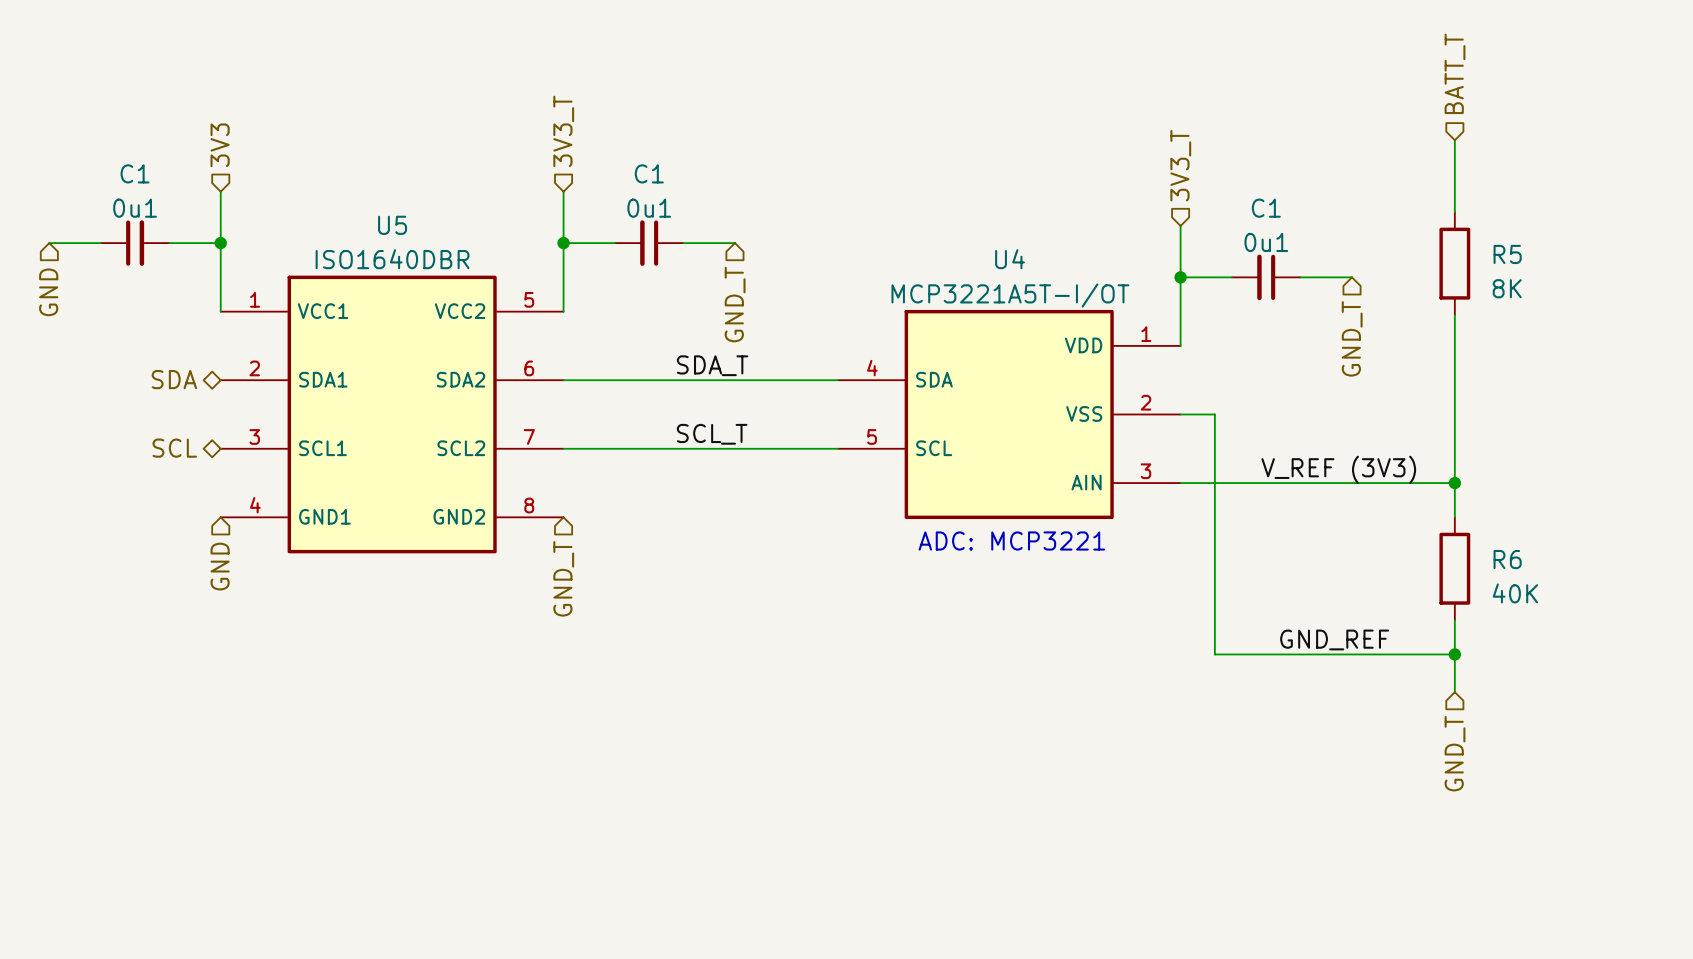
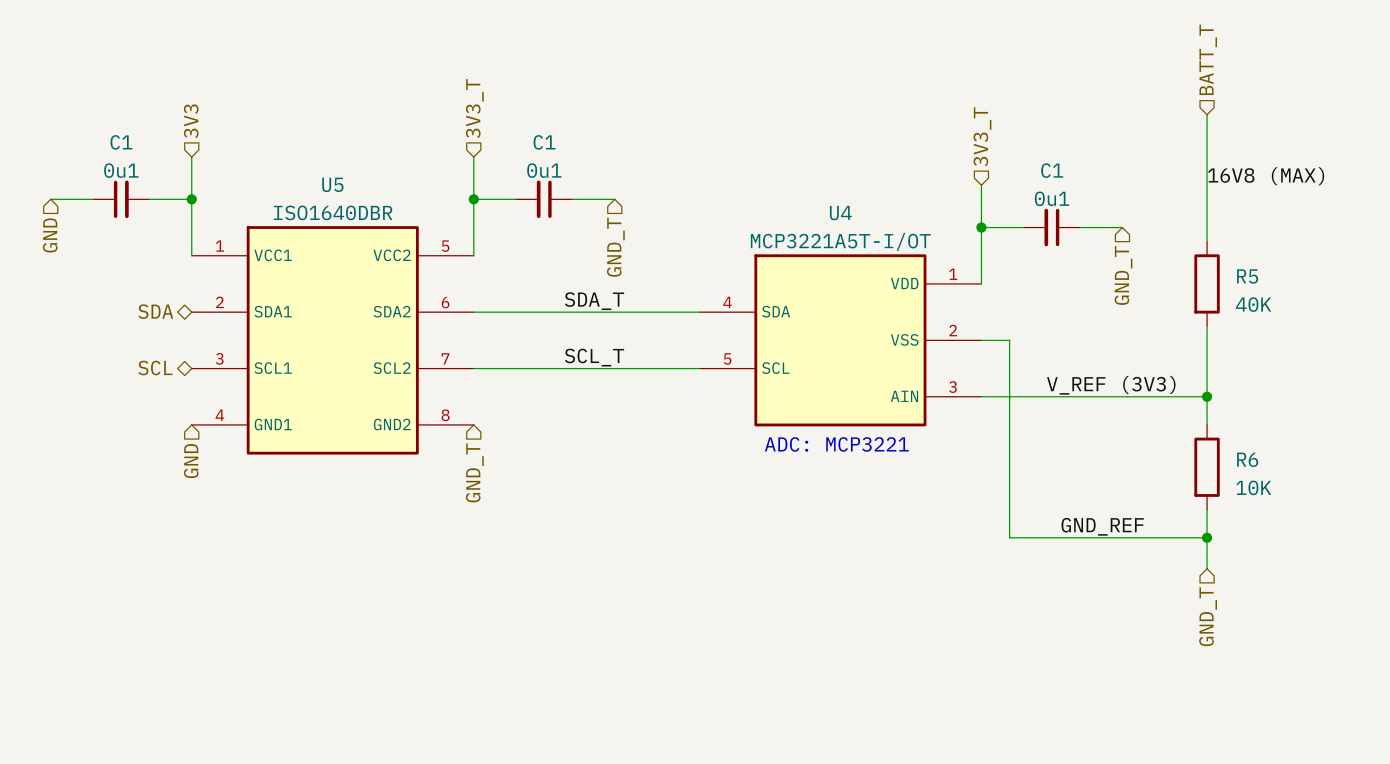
label: none -> 16V8 (MAX) (1266, 176)
R5 position: (1454, 263) -> (1207, 283)
R5 value: 8K (1507, 288) -> 40K (1253, 304)
wire: (1454, 315) (1454, 397) -> (1207, 173) (1207, 241)
R6 value: 40K (1515, 593) -> 10K (1253, 487)

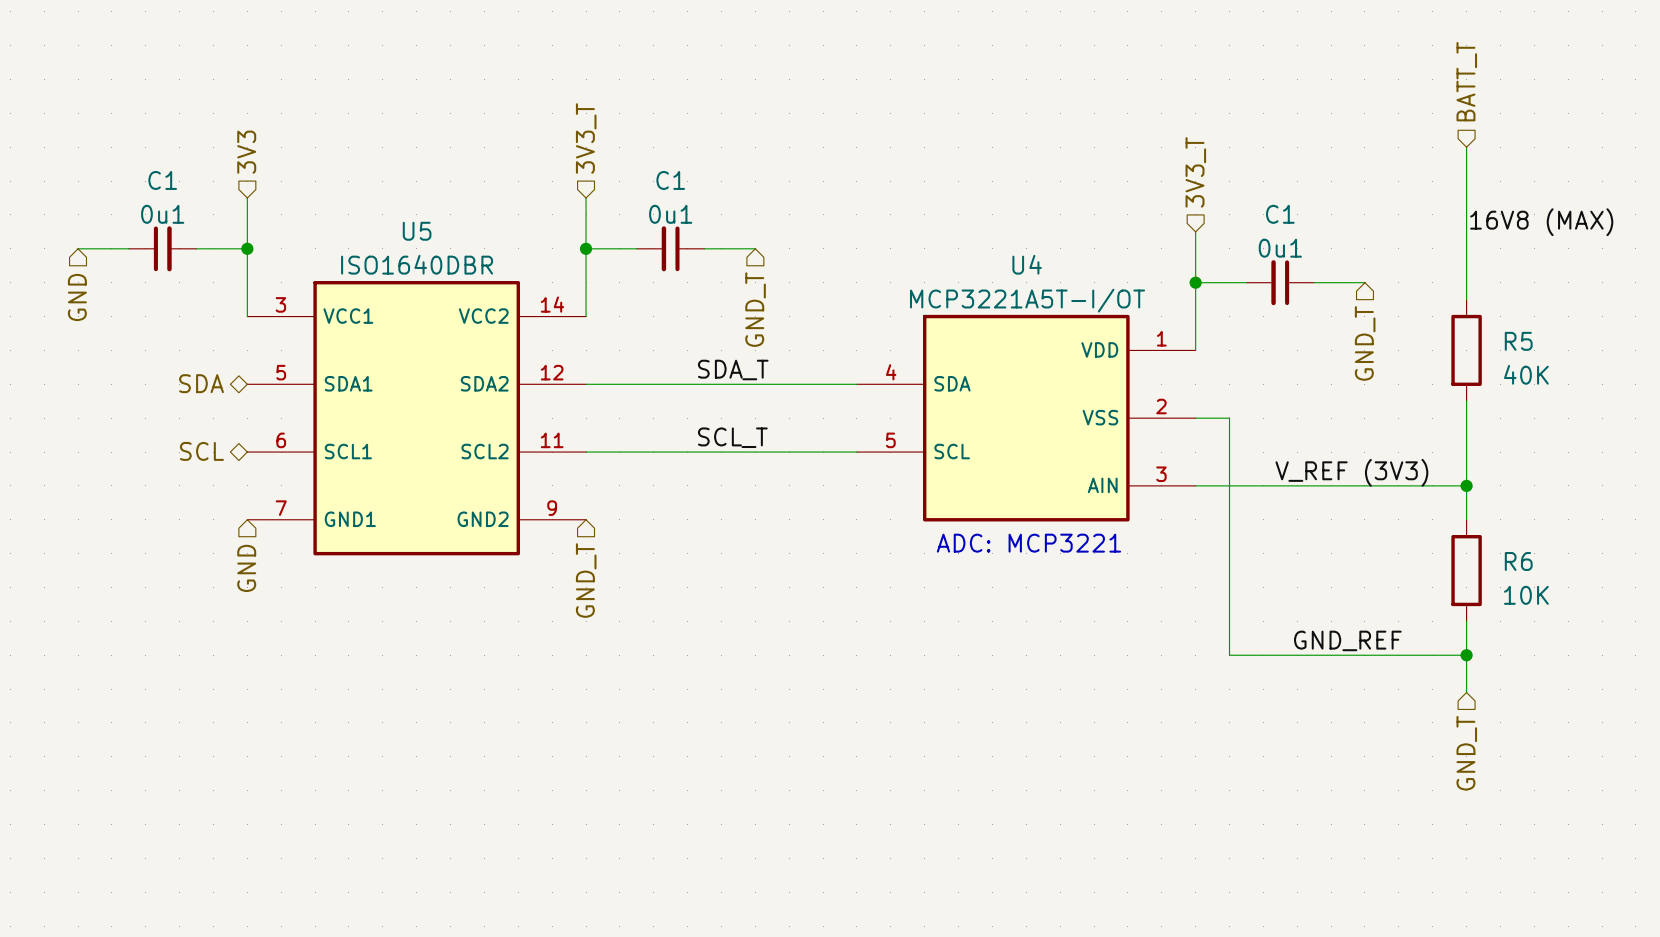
U5 pin number: 1 (220, 246) -> 3 (280, 304)
U5 pin number: 5 (445, 246) -> 14 (552, 304)
U5 pin number: 2 (219, 302) -> 5 (281, 372)
U5 pin number: 6 (445, 302) -> 12 (552, 372)
U5 pin number: 3 (219, 358) -> 6 (281, 440)
U5 pin number: 7 (445, 358) -> 11 (552, 440)
U5 pin number: 4 (219, 415) -> 7 (281, 508)
U5 pin number: 8 (445, 415) -> 9 (552, 508)

